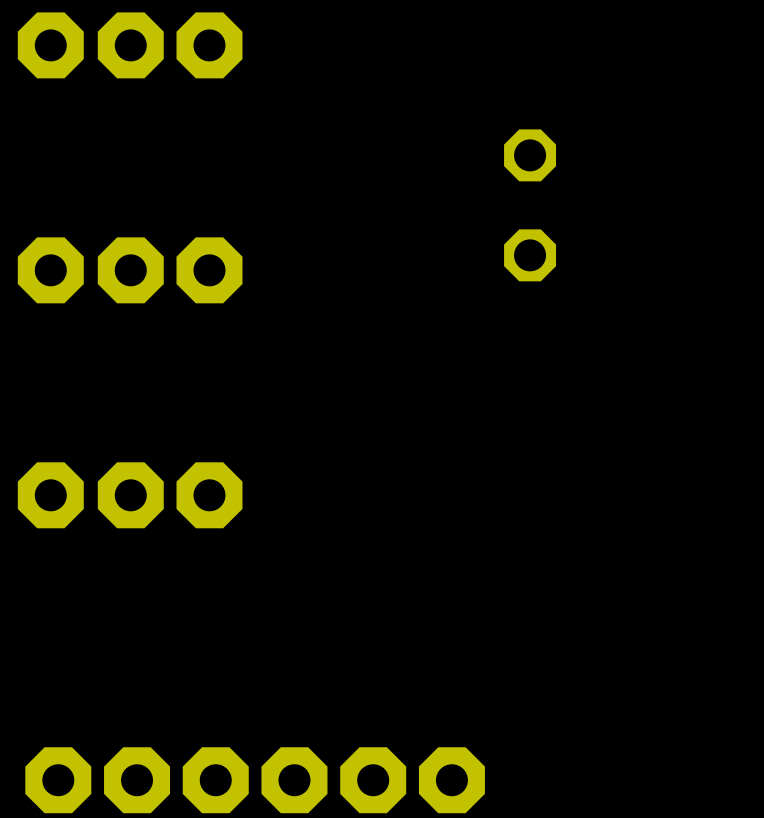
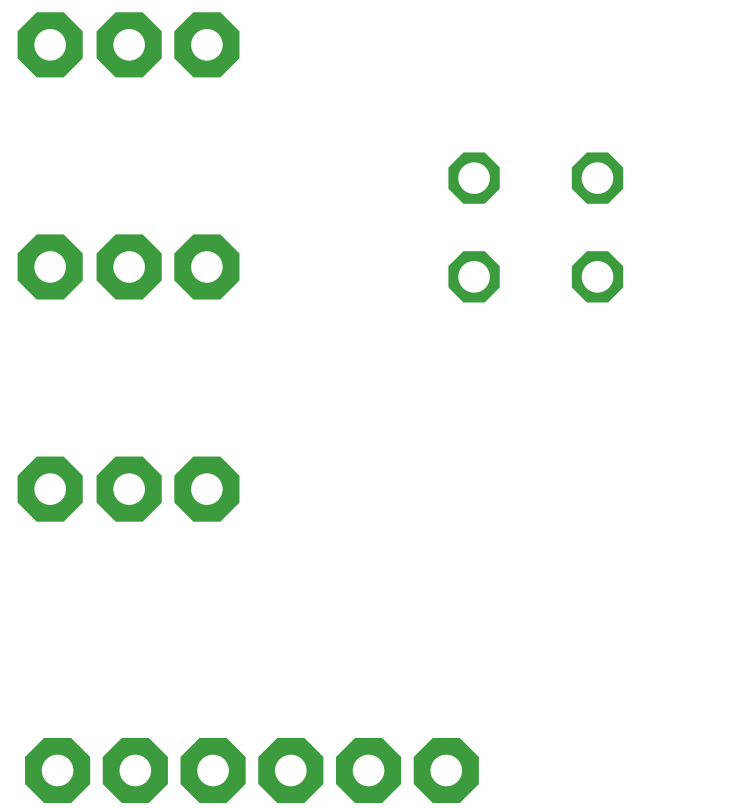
part: (530, 205) -> none
part: none -> (474, 227)
part: none -> (597, 227)

